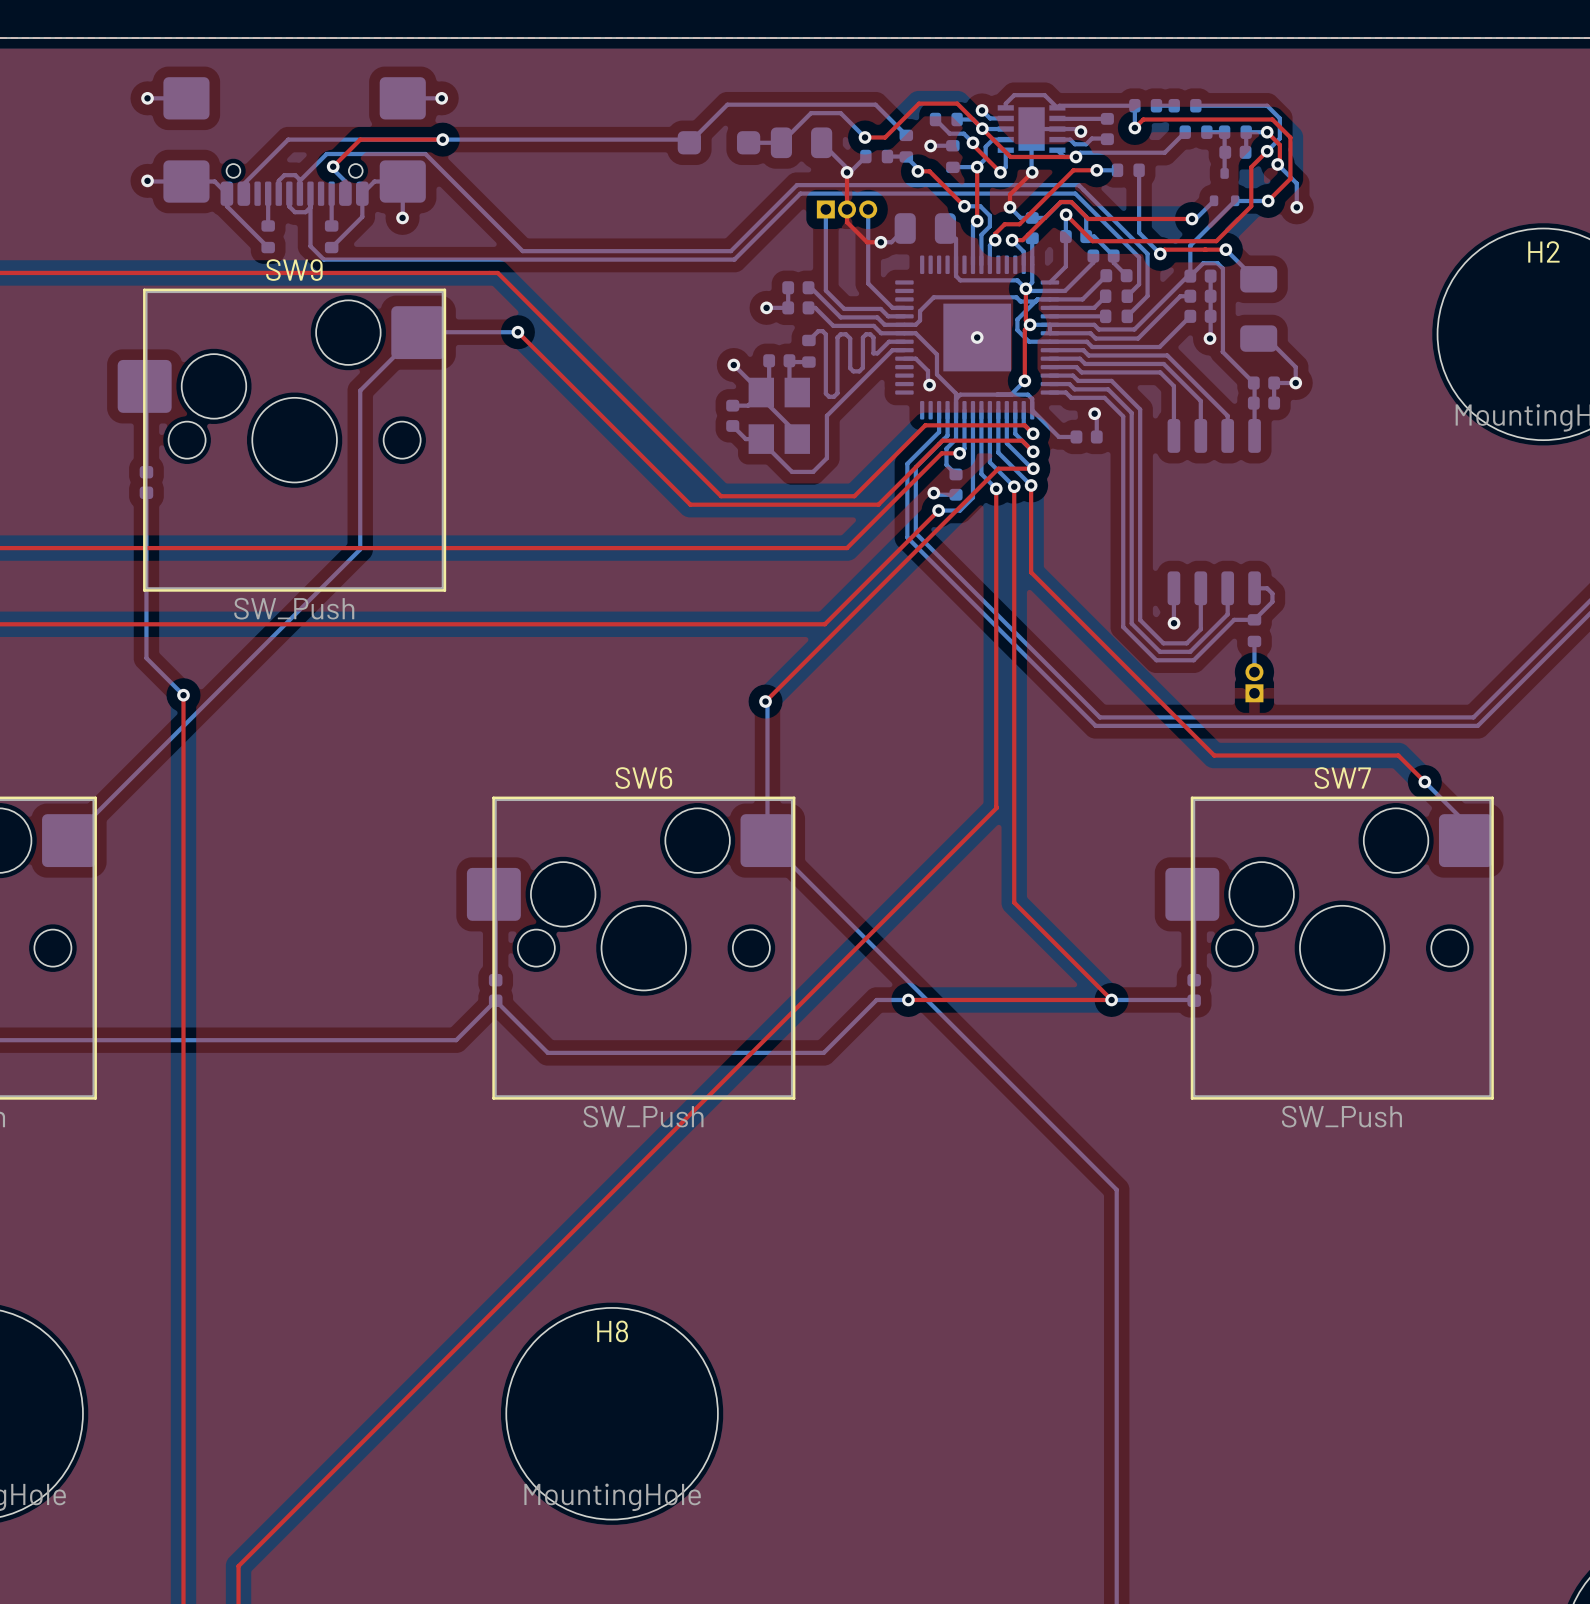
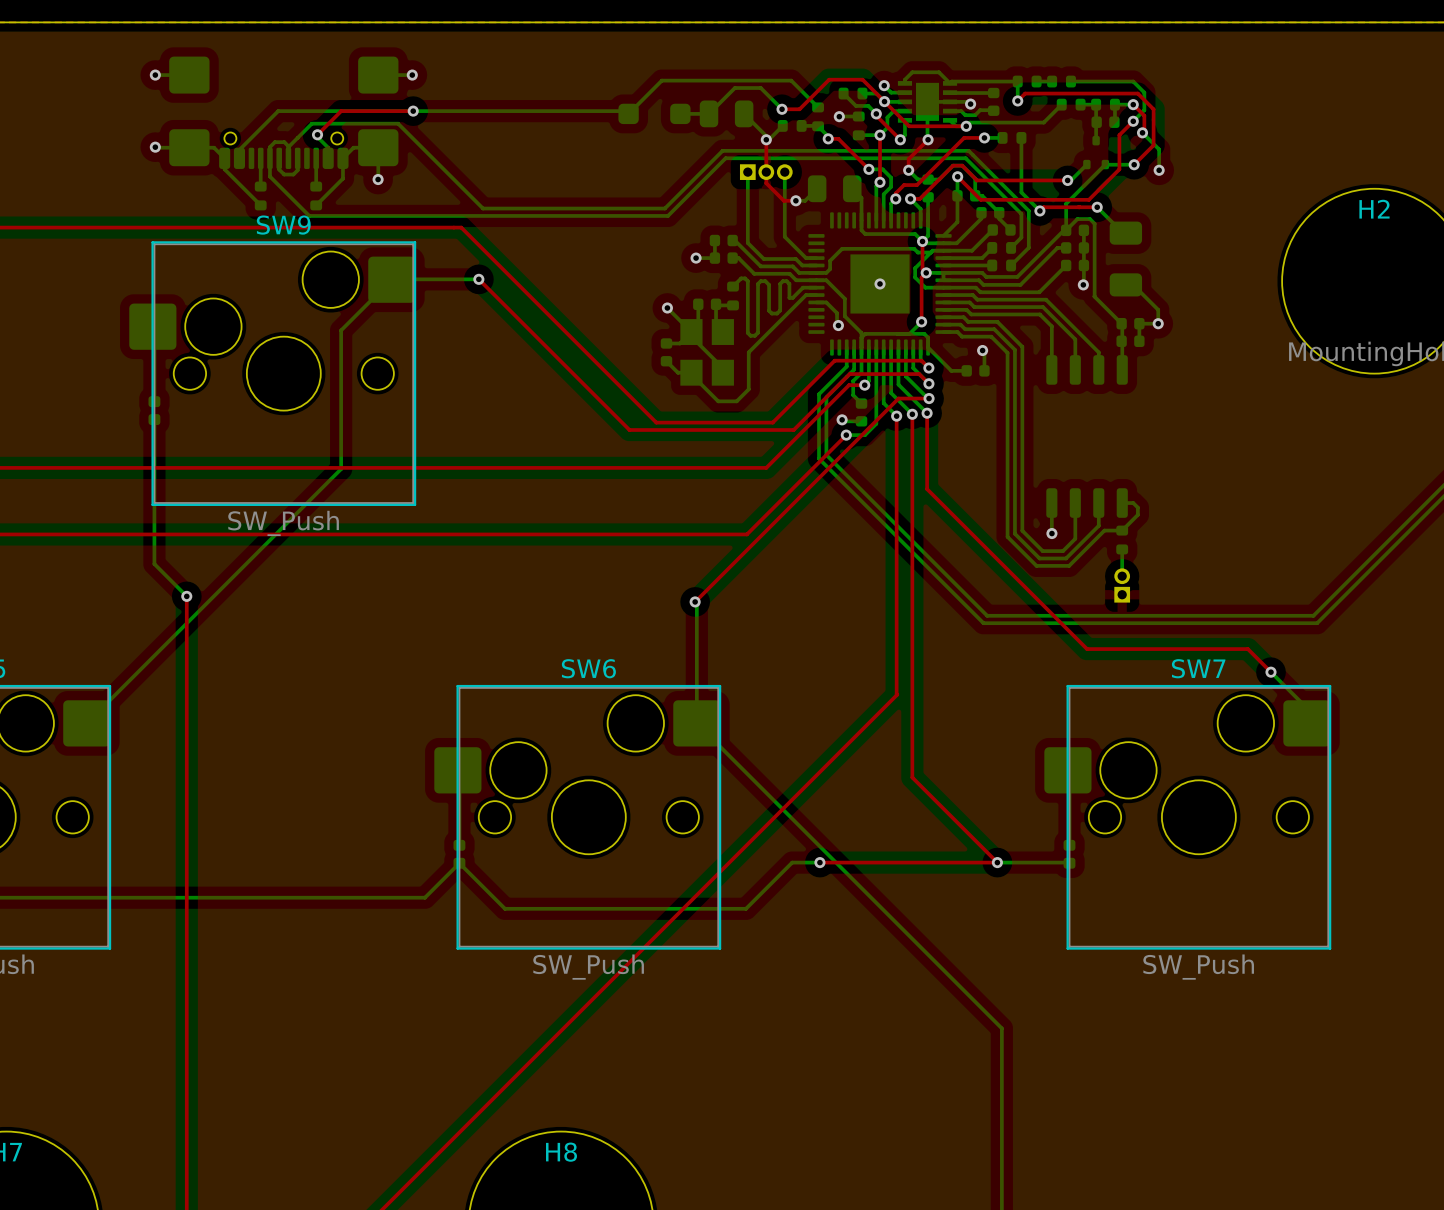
bottom track: (310, 207) (310, 246) -> (269, 158) (269, 176) (297, 204)

